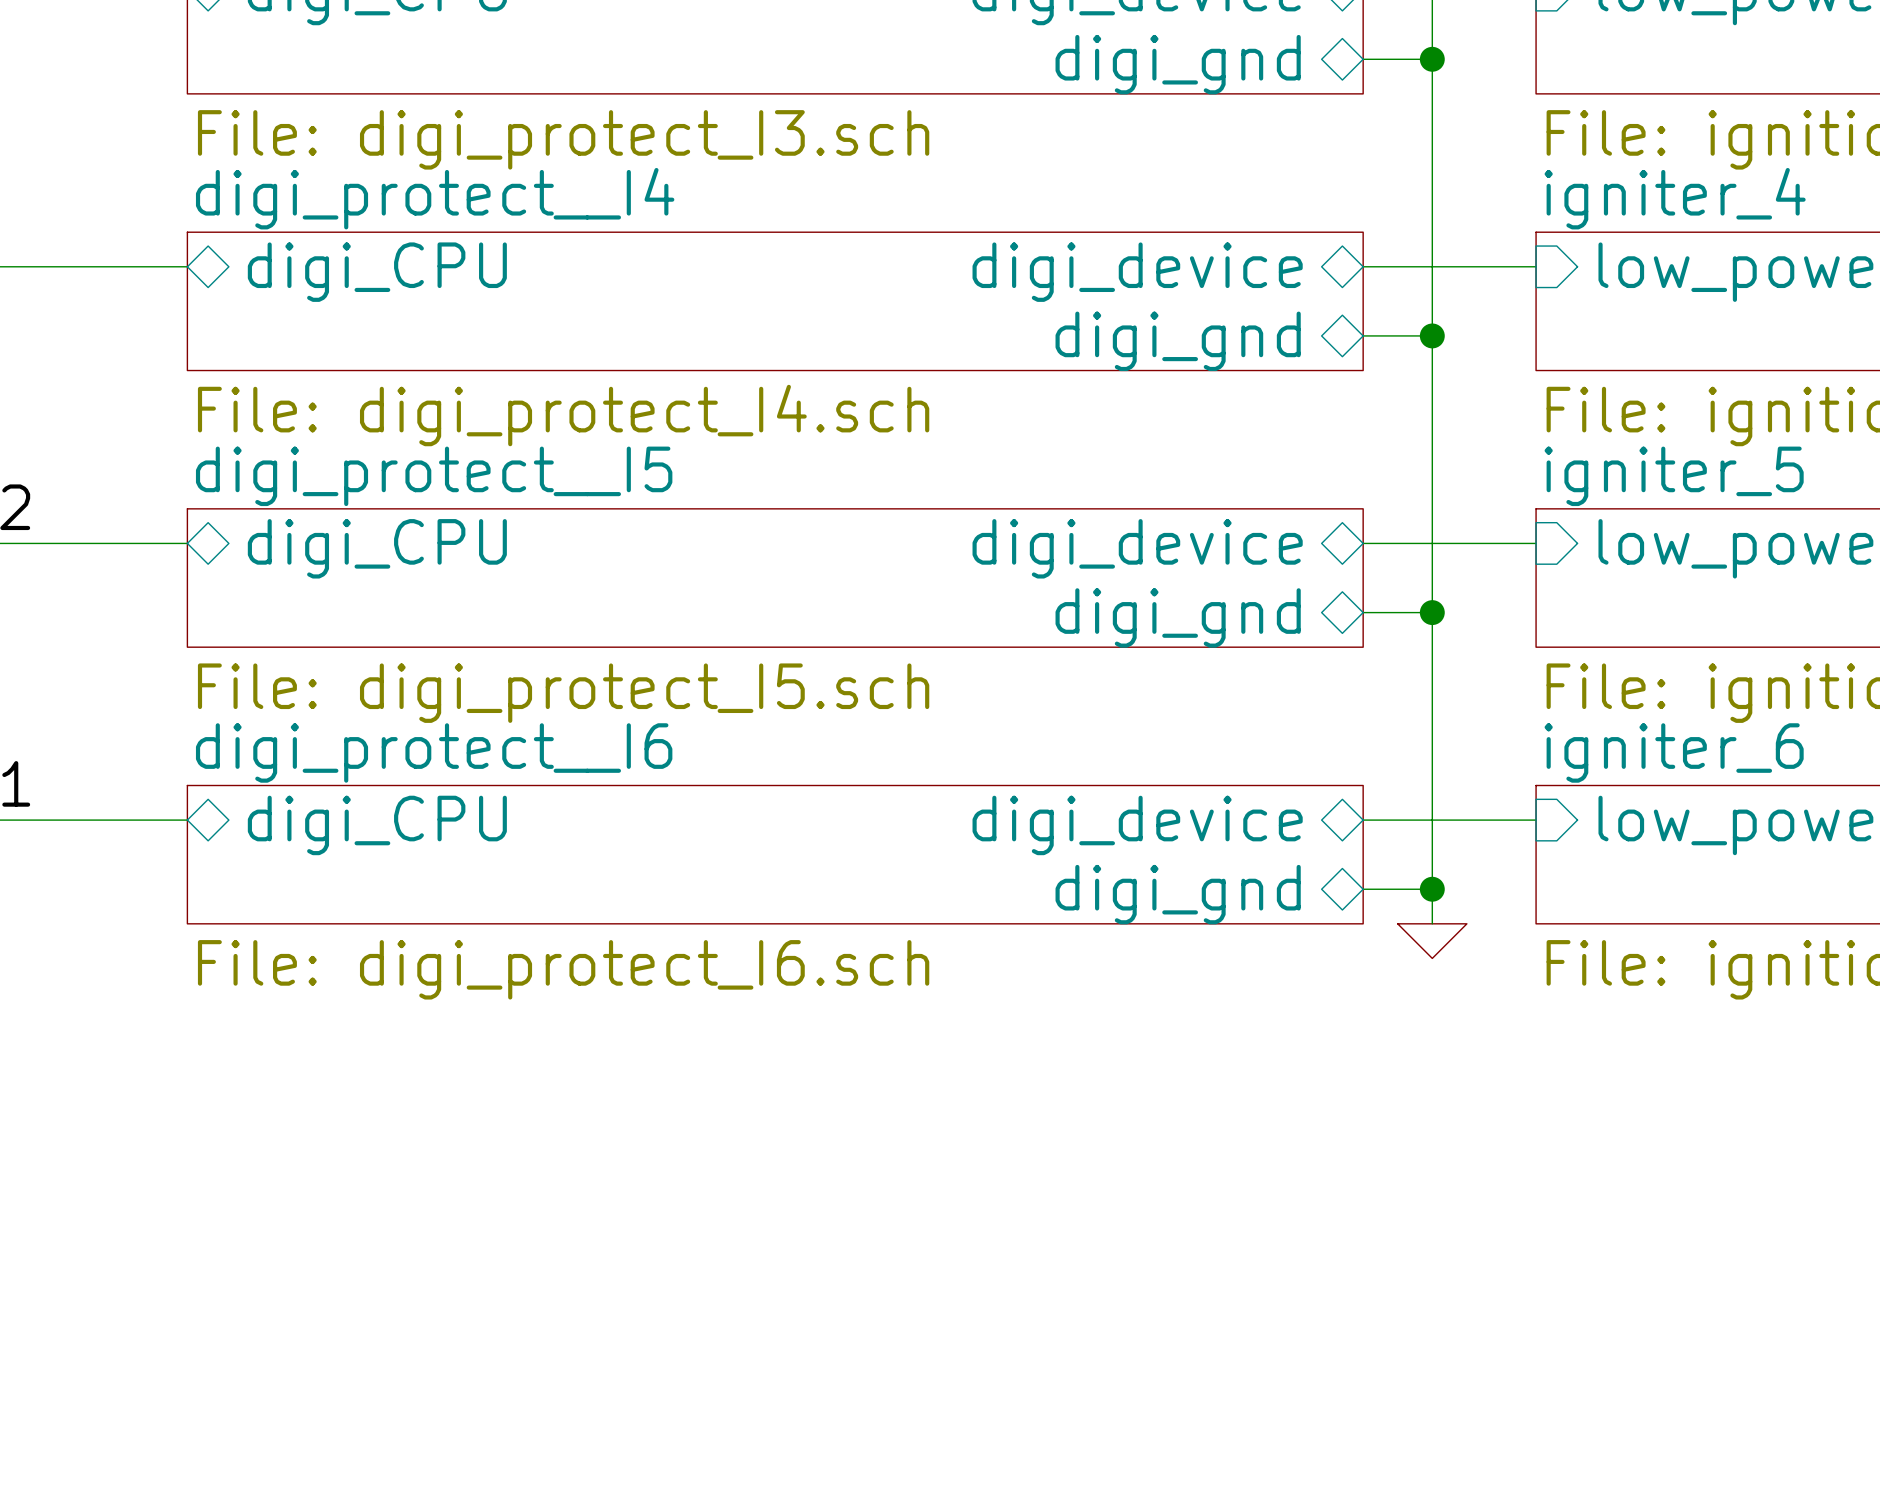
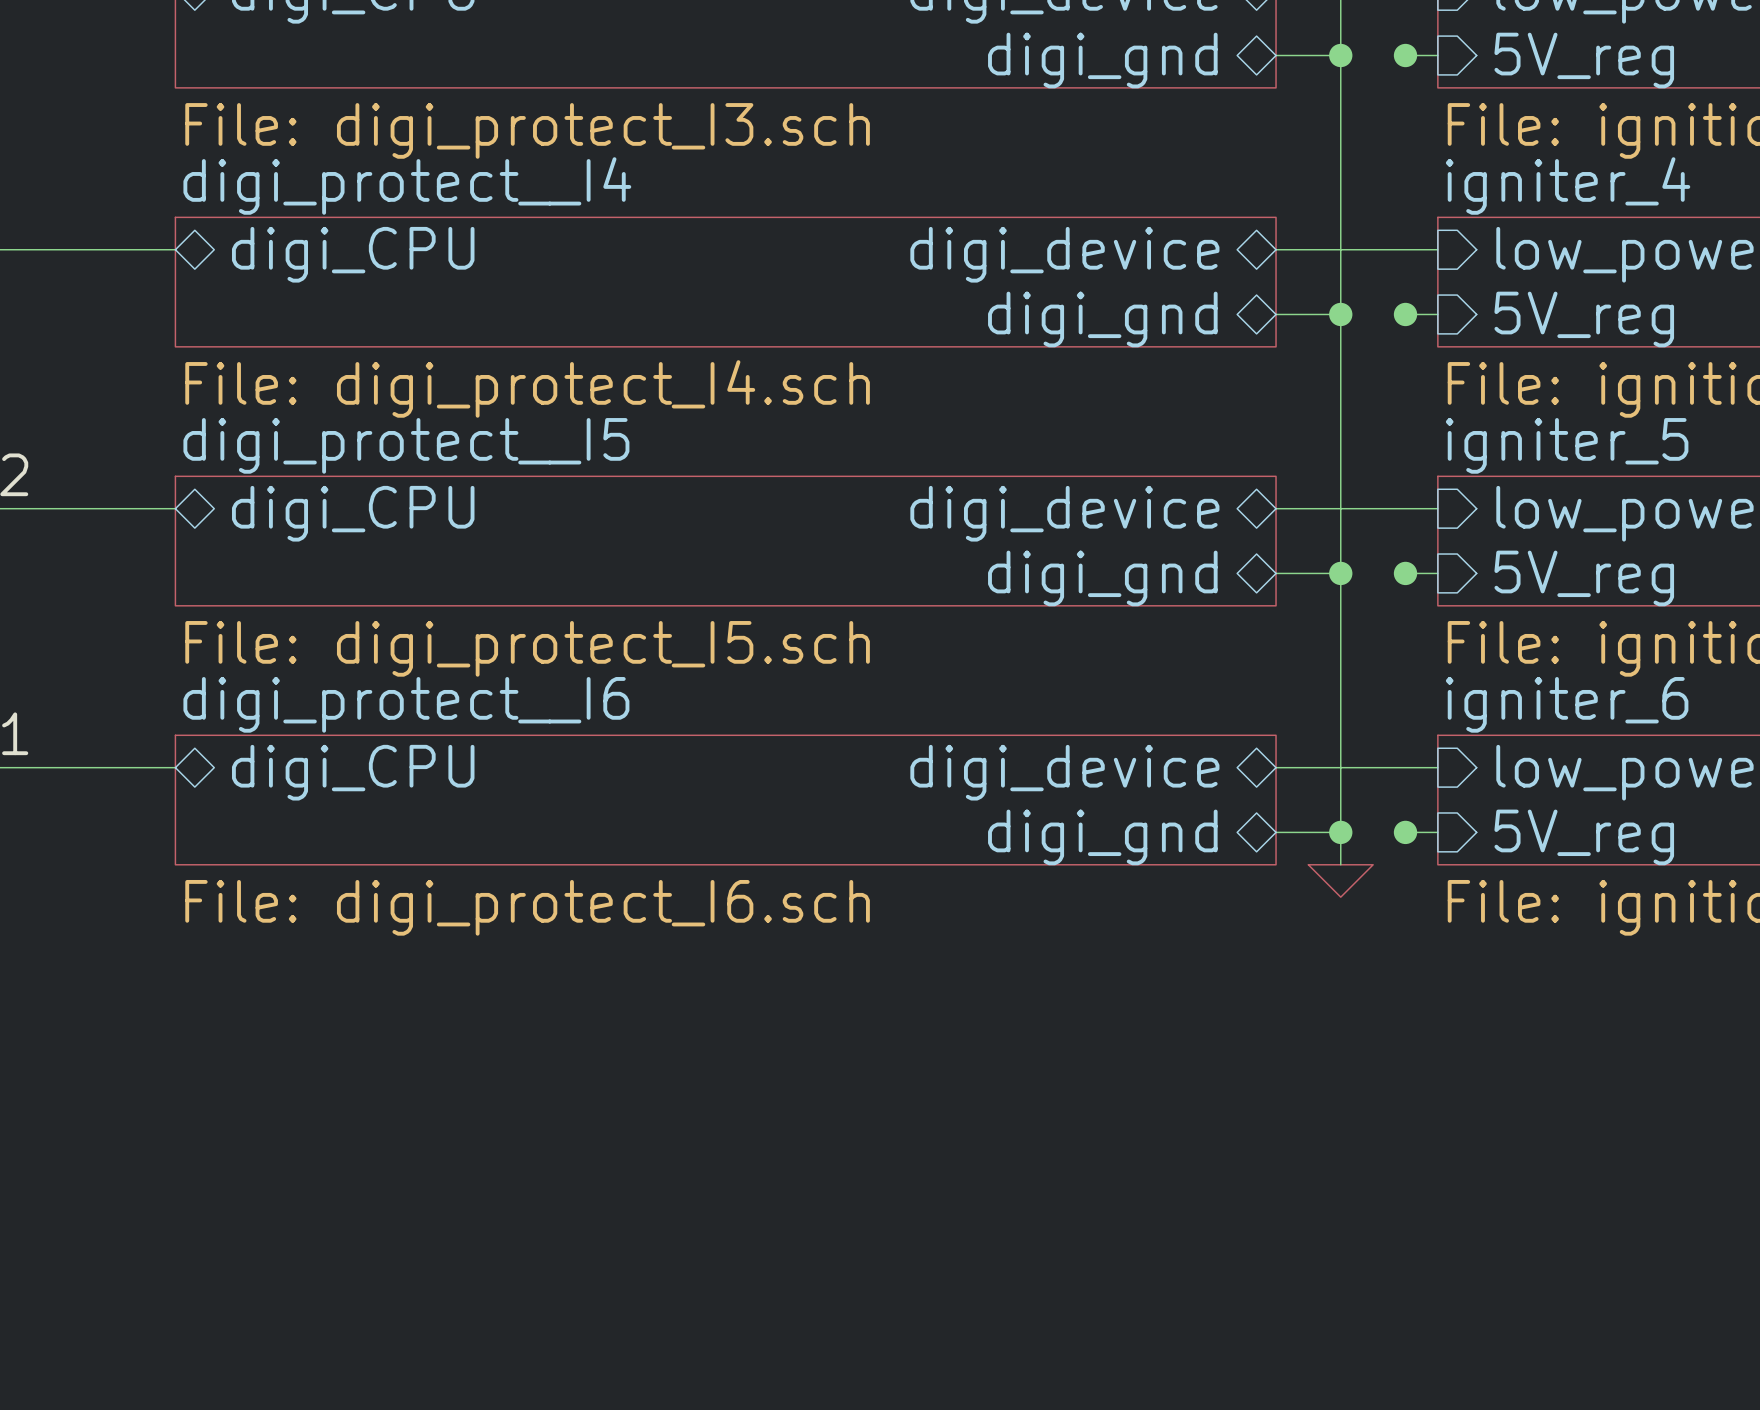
wire: none -> (1405, 55) (1437, 55)
junction: none -> (1405, 55)
sheet pin: none -> 5V_reg (1584, 60)
wire: none -> (1405, 314) (1437, 314)
junction: none -> (1405, 314)
sheet pin: none -> 5V_reg (1584, 319)
wire: none -> (1405, 573) (1437, 573)
junction: none -> (1405, 573)
sheet pin: none -> 5V_reg (1584, 578)
wire: none -> (1405, 832) (1437, 832)
junction: none -> (1405, 832)
sheet pin: none -> 5V_reg (1584, 837)

